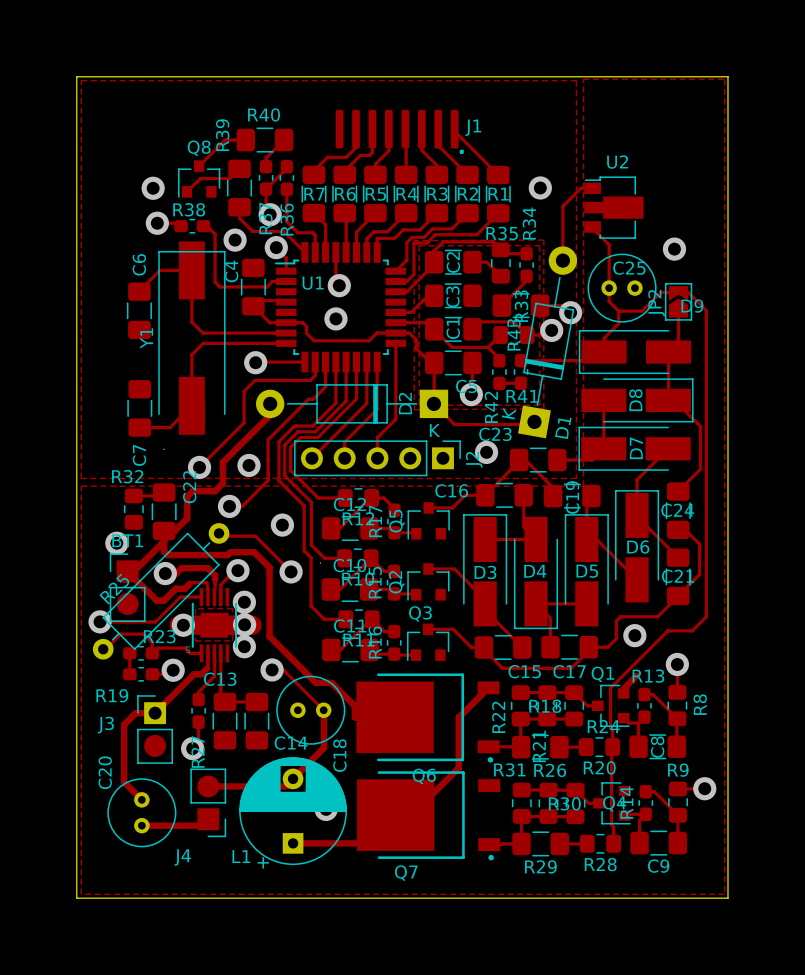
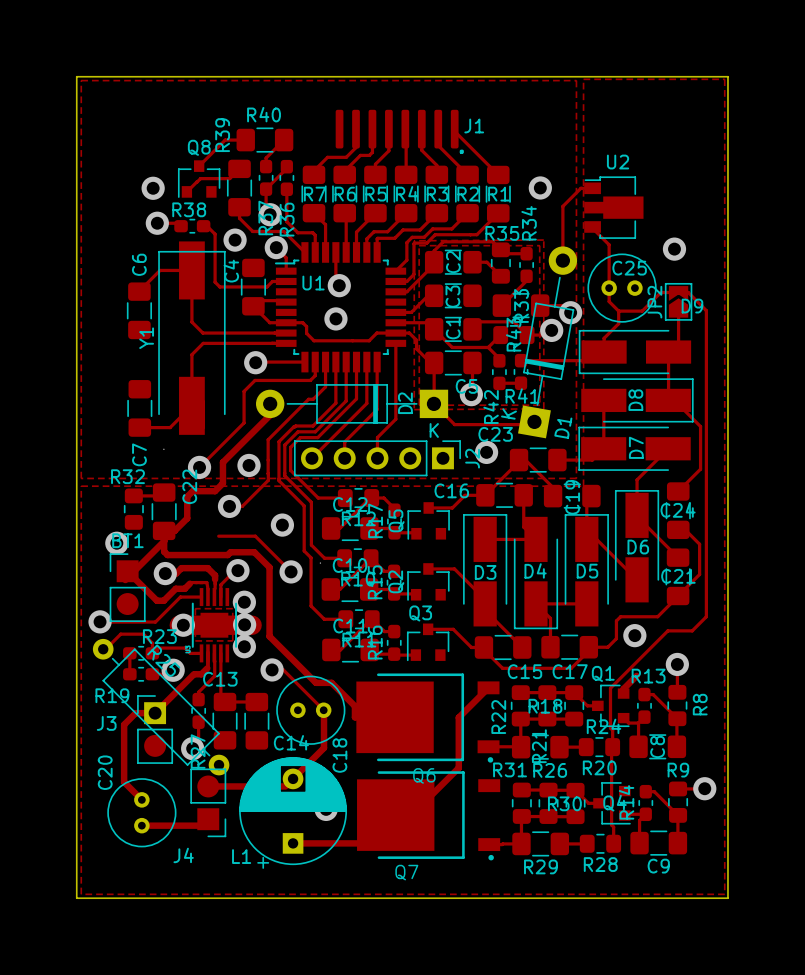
R25 rotation: 0° (161, 591) -> 90° clockwise (161, 707)
R25 position: (161, 591) -> (161, 707)

